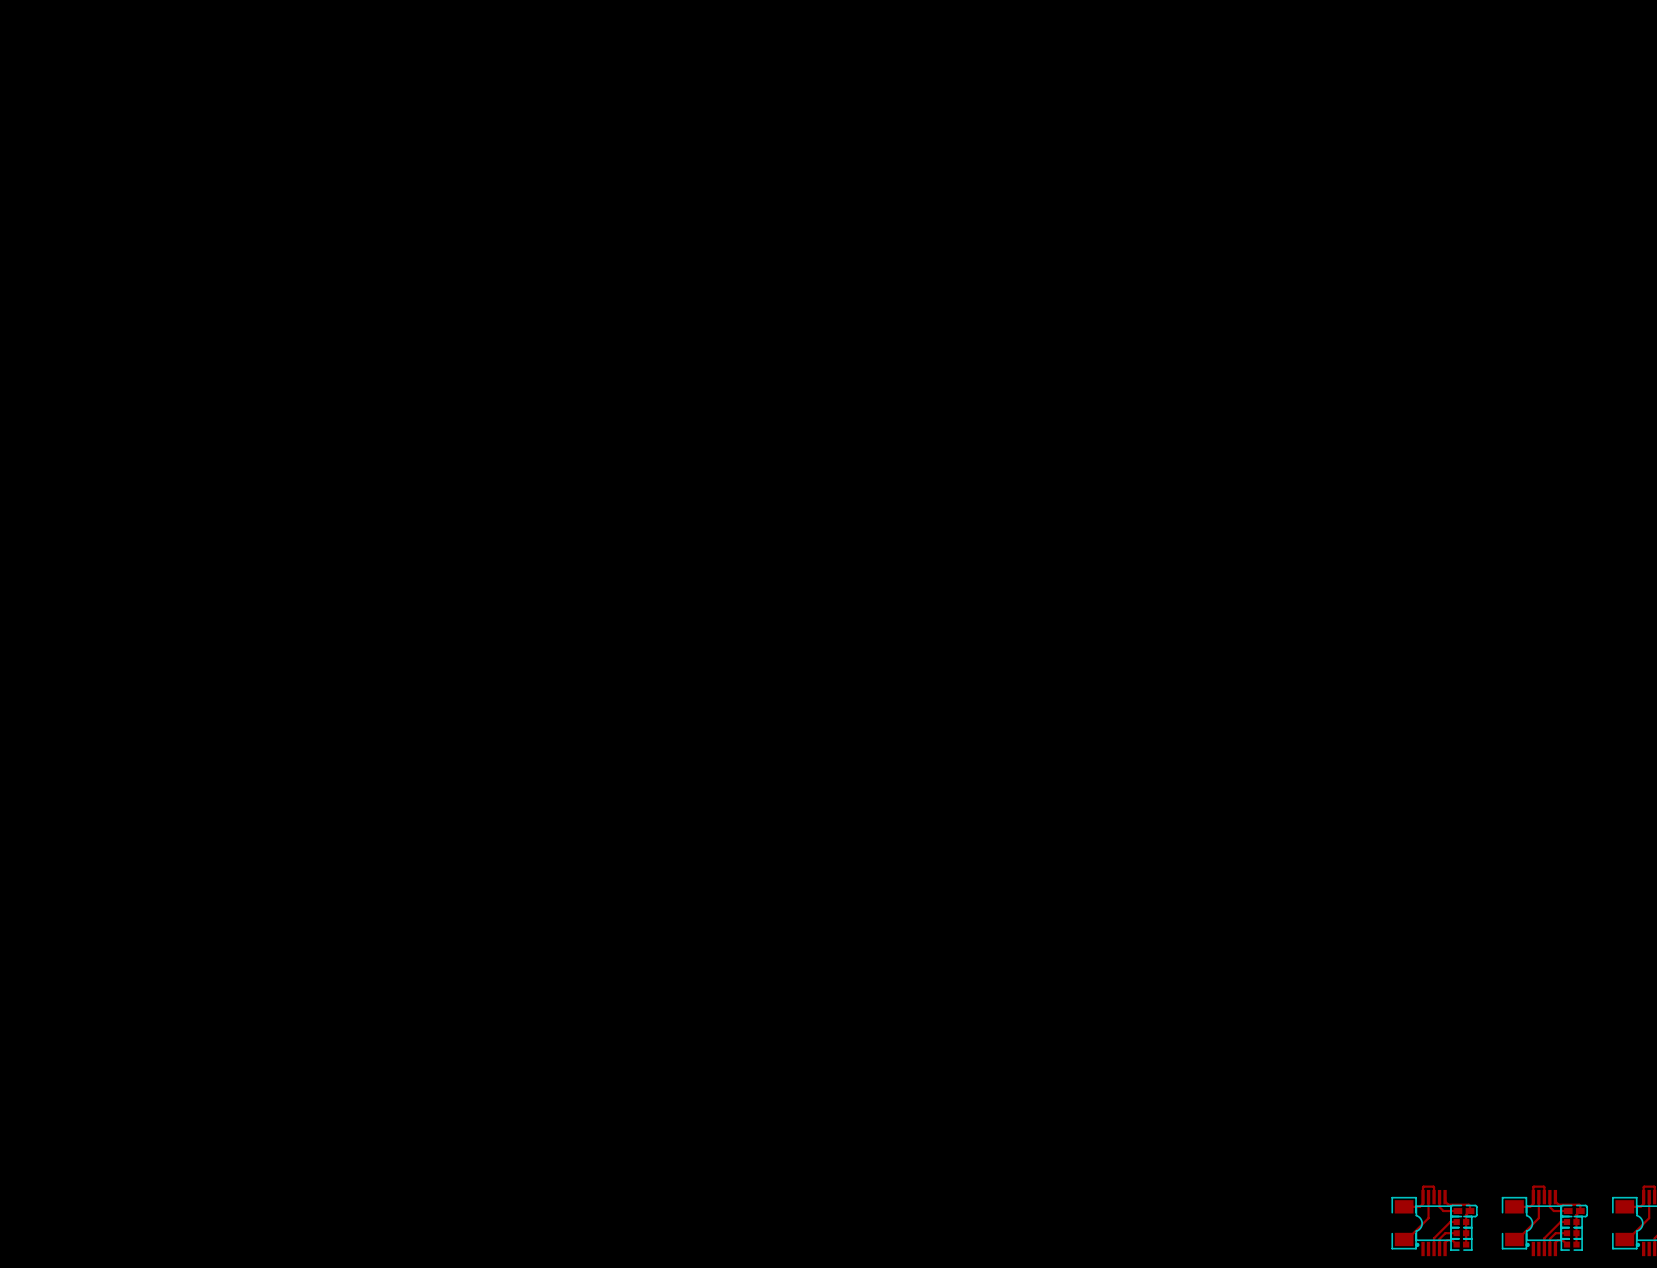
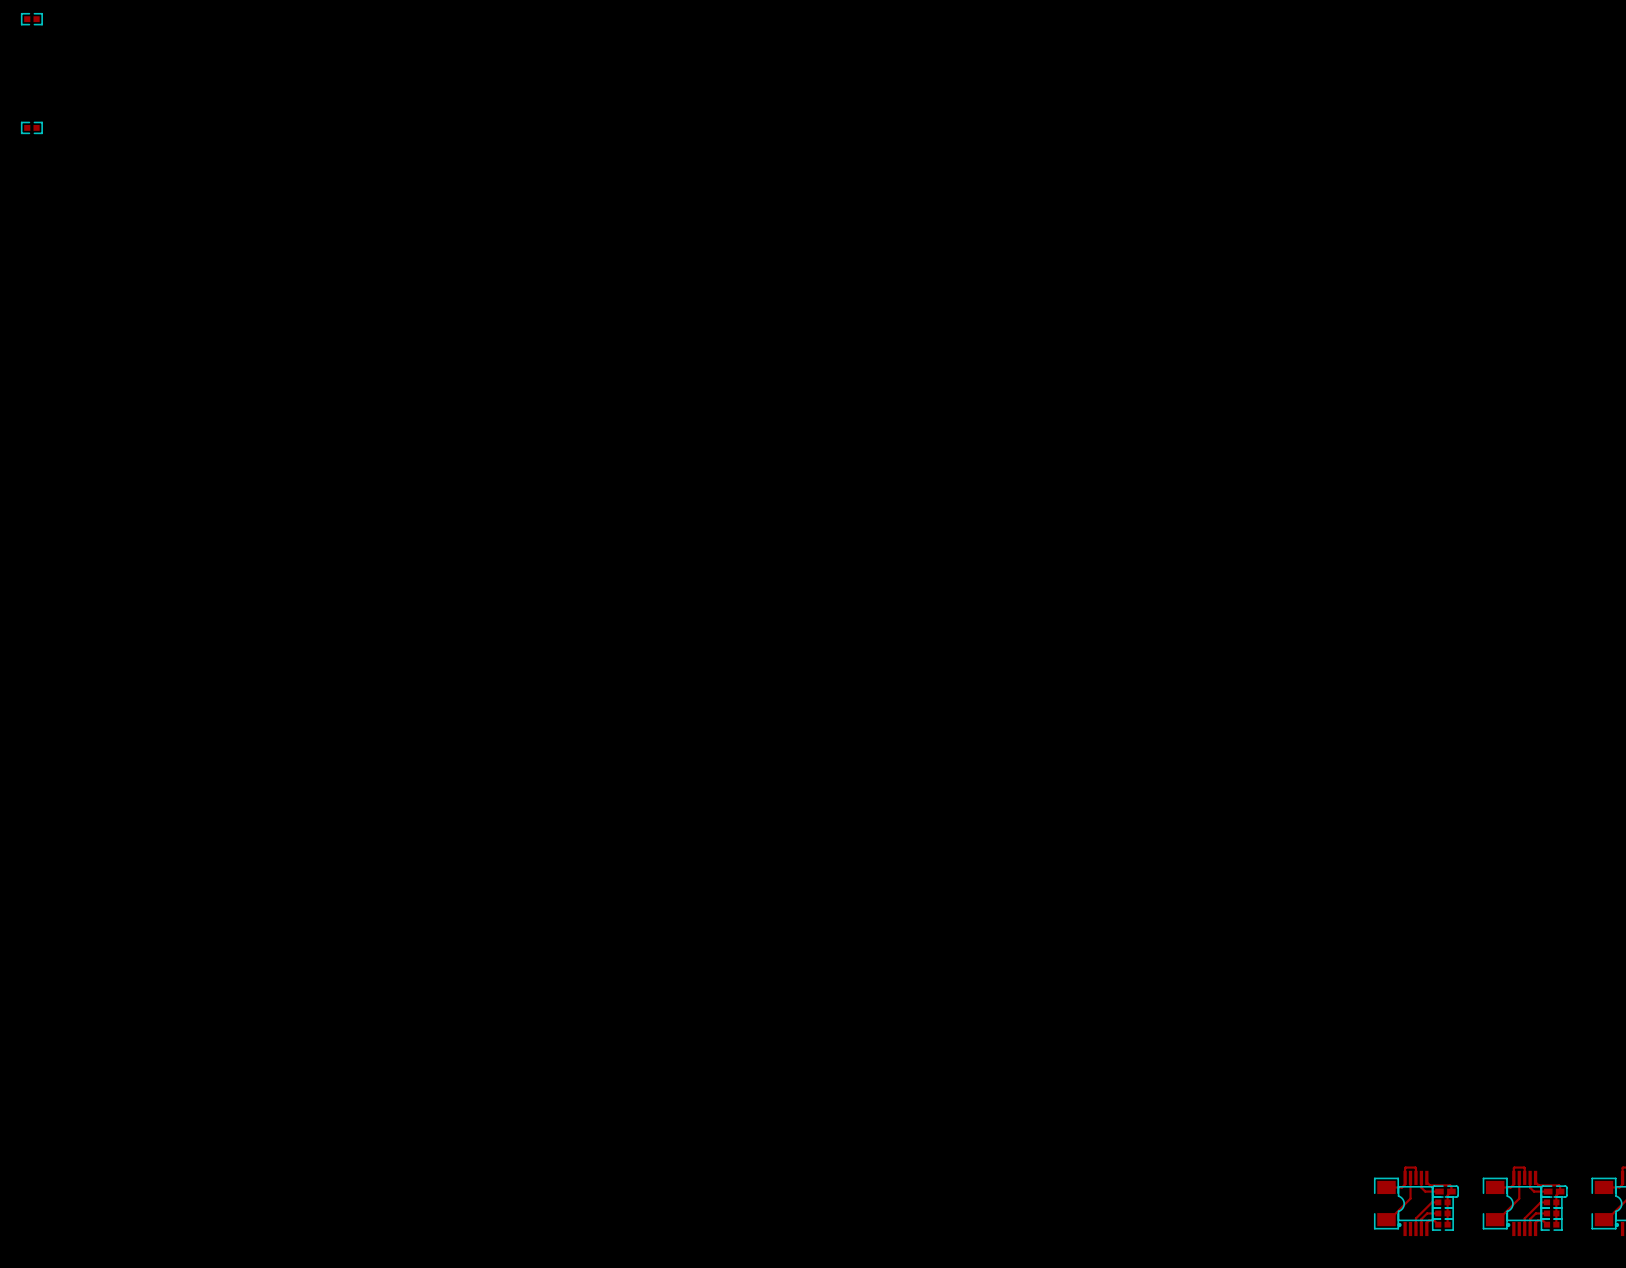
part: none -> (31, 19)
part: none -> (31, 127)

